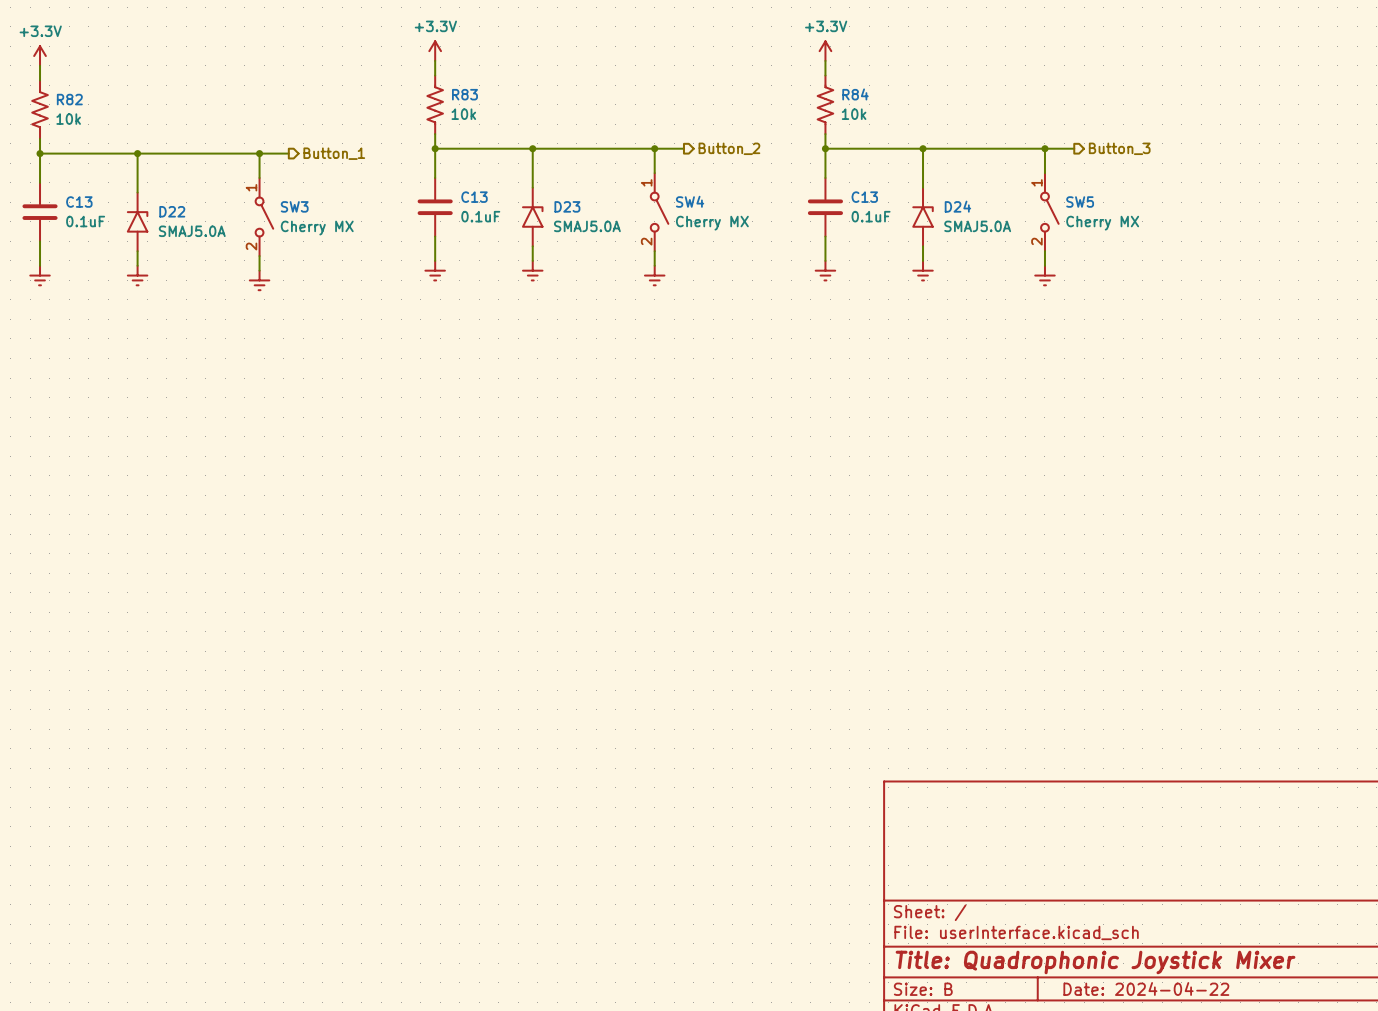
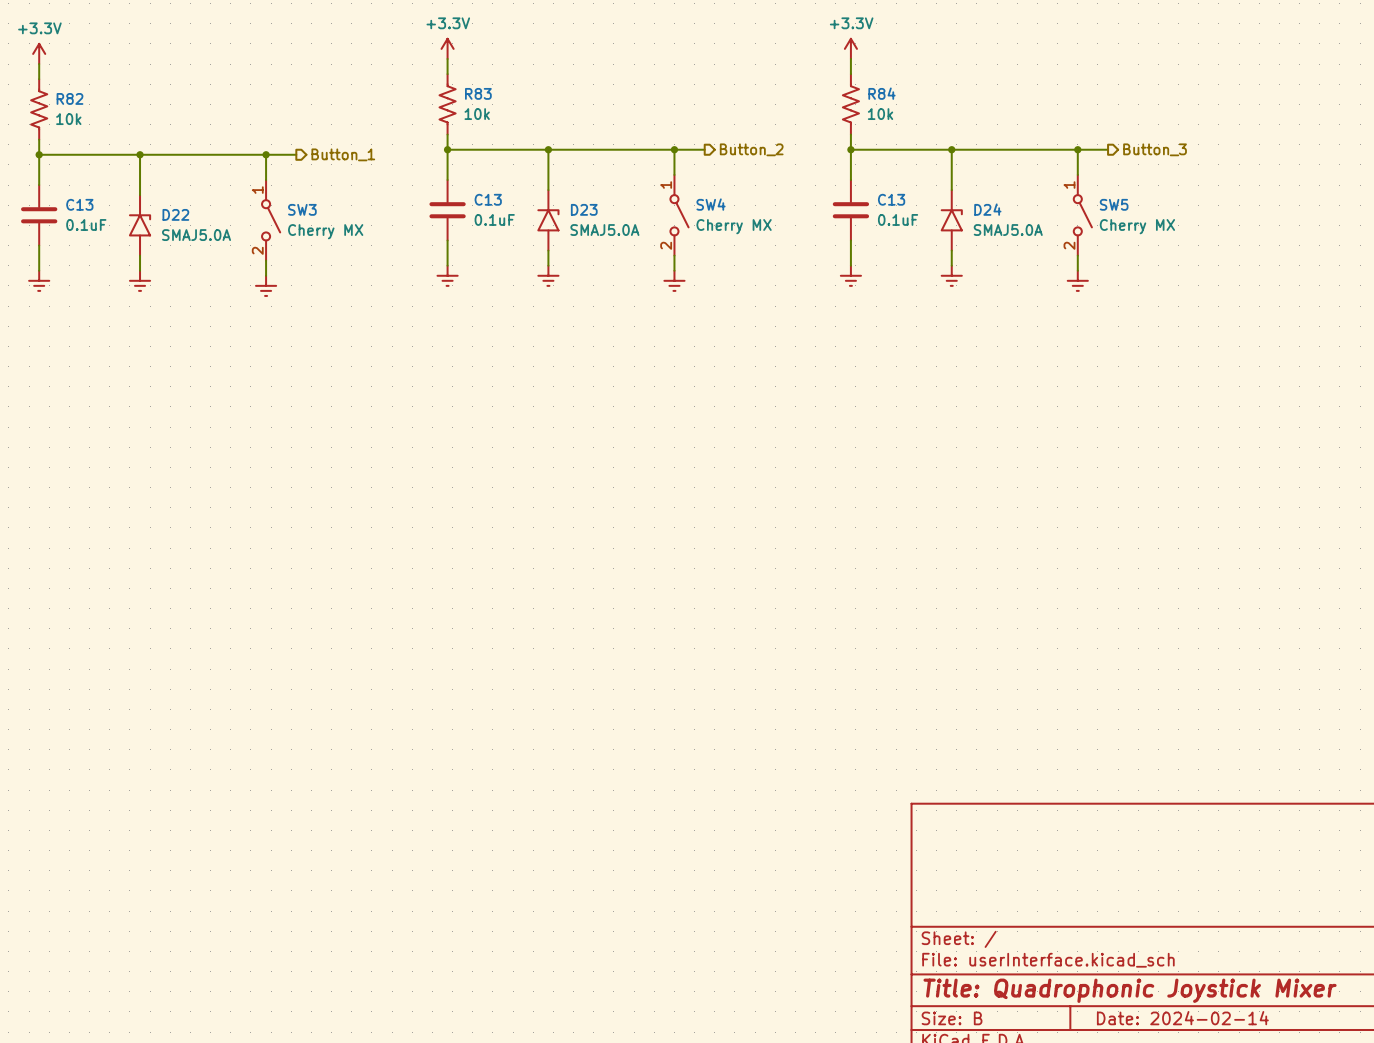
title block: Date: 2024-04-22 (1146, 988) -> Date: 2024-02-14 (1182, 1018)

